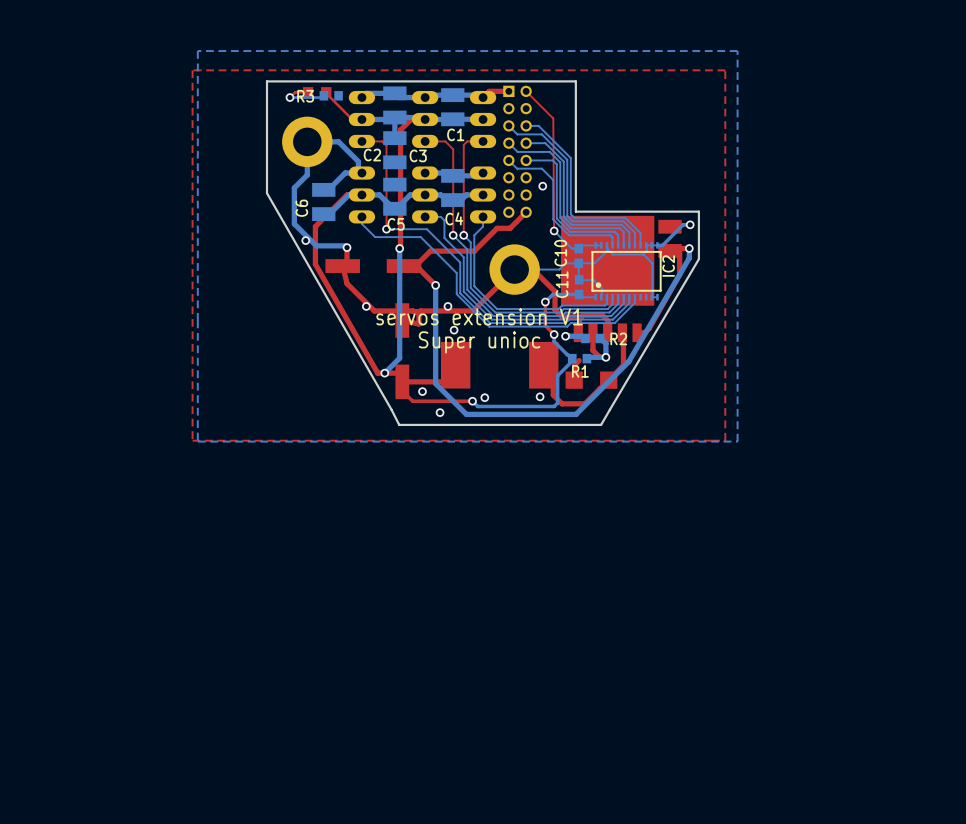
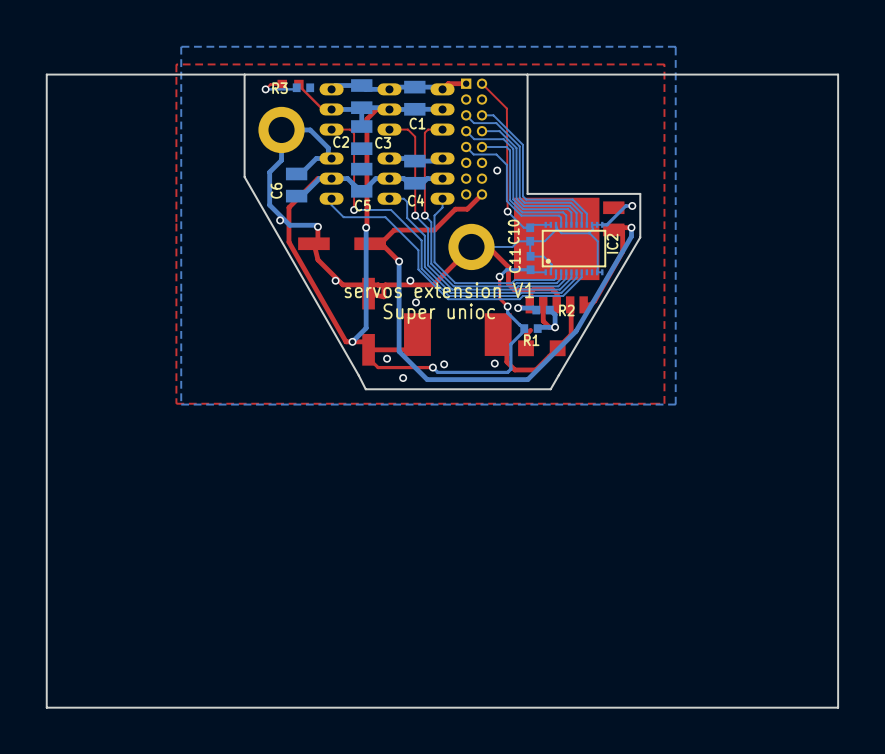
board edge: none -> (527, 74) (838, 74) (838, 707) (46, 707) (46, 74) (244, 74)

